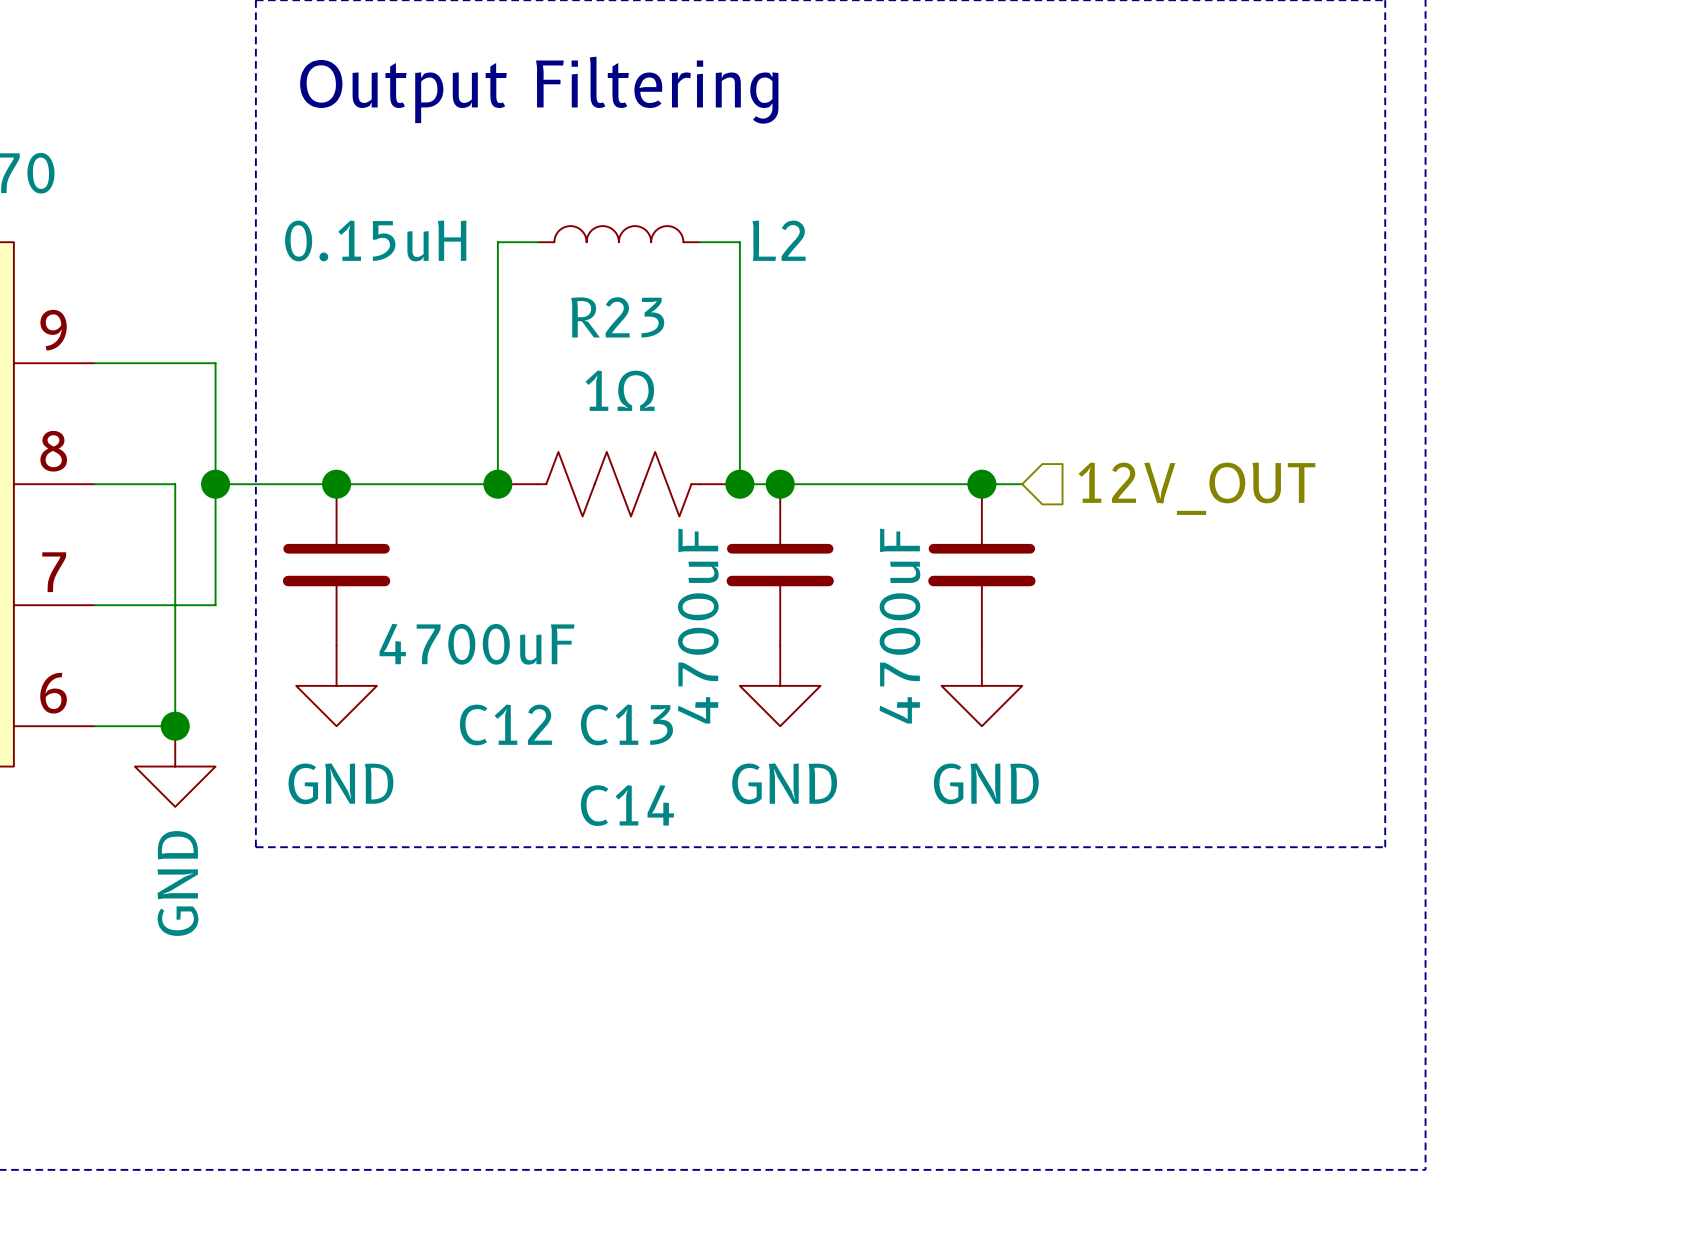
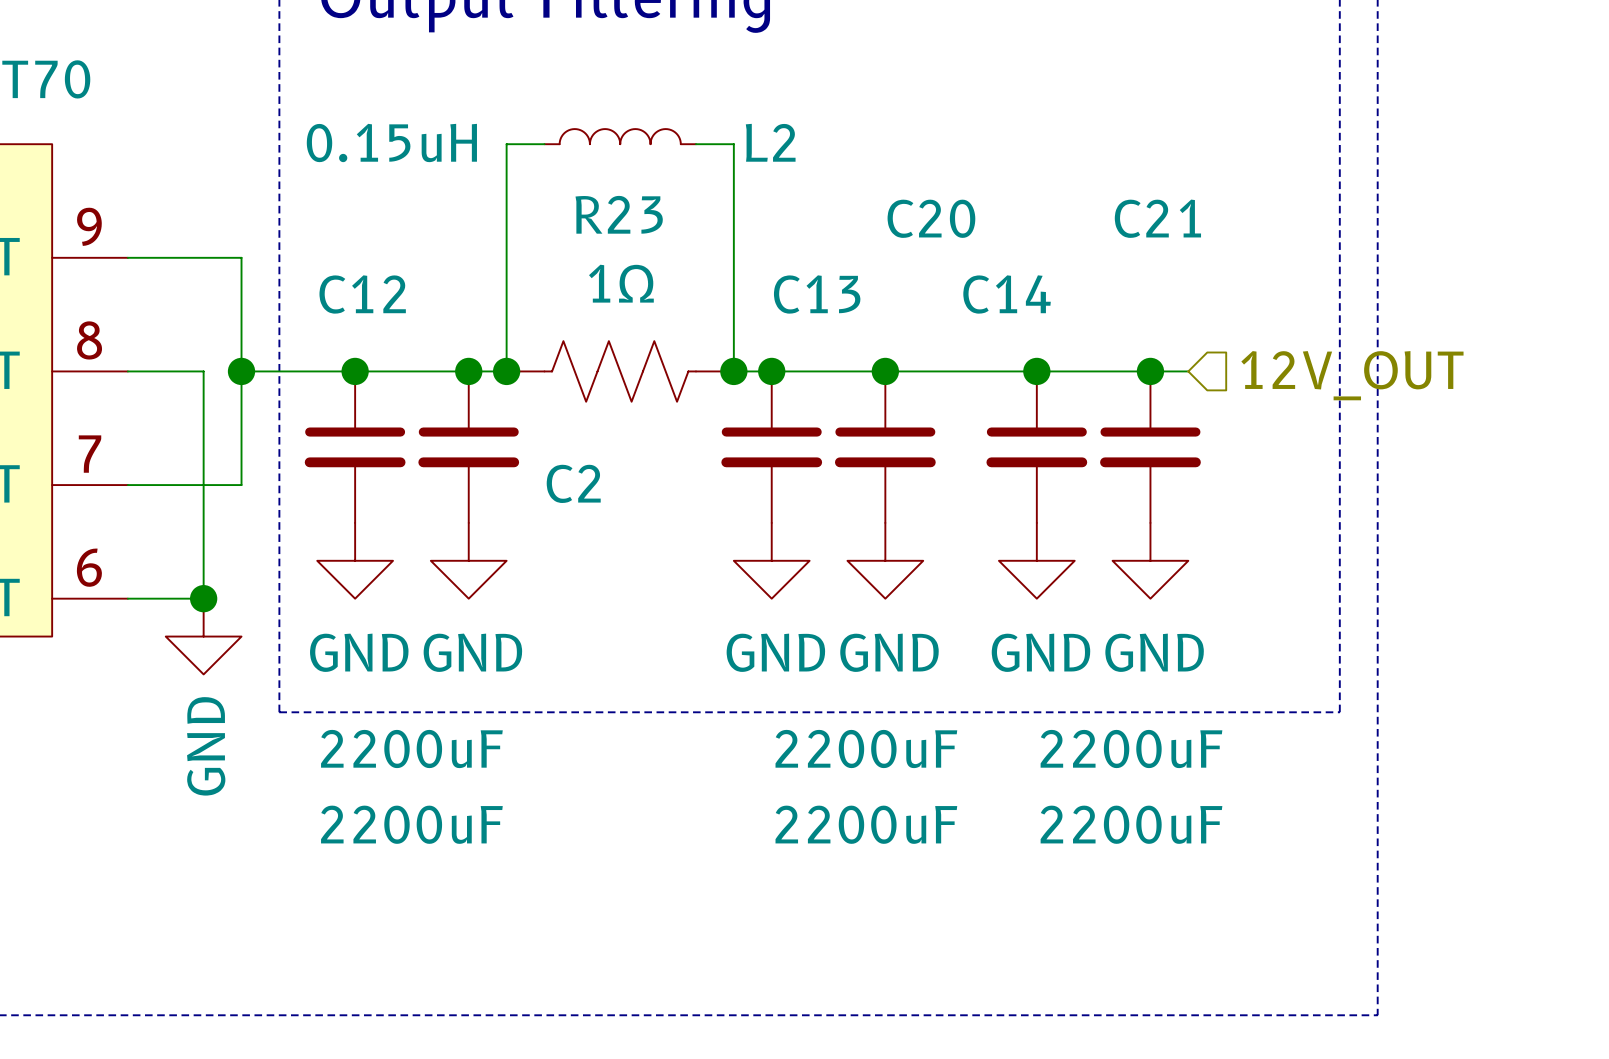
junction: none -> (468, 371)
junction: none -> (885, 371)
junction: (981, 484) -> none
wire: none -> (998, 371) (1188, 371)
junction: none -> (1036, 371)
junction: none -> (1150, 371)
hierarchical label position: 12V_OUT (1196, 488) -> 12V_OUT (1352, 375)
C2: none -> 2200uF (468, 447)
C20: none -> 2200uF (885, 447)
C14 position: (981, 564) -> (1036, 447)
C21: none -> 2200uF (1150, 447)
C13 value: 4700uF (698, 626) -> 2200uF (866, 748)
C14 value: 4700uF (899, 626) -> 2200uF (1131, 748)
C12 value: 4700uF (476, 644) -> 2200uF (411, 748)
power symbol: none -> GND (468, 560)
power symbol: none -> GND (885, 560)
power symbol: GND (981, 685) -> none
power symbol: none -> GND (1036, 560)
power symbol: none -> GND (1150, 560)
C12 name position: C12 (505, 724) -> C12 (362, 294)
C13 name position: C13 (626, 724) -> C13 (817, 294)
C14 name position: C14 (627, 805) -> C14 (1007, 294)

